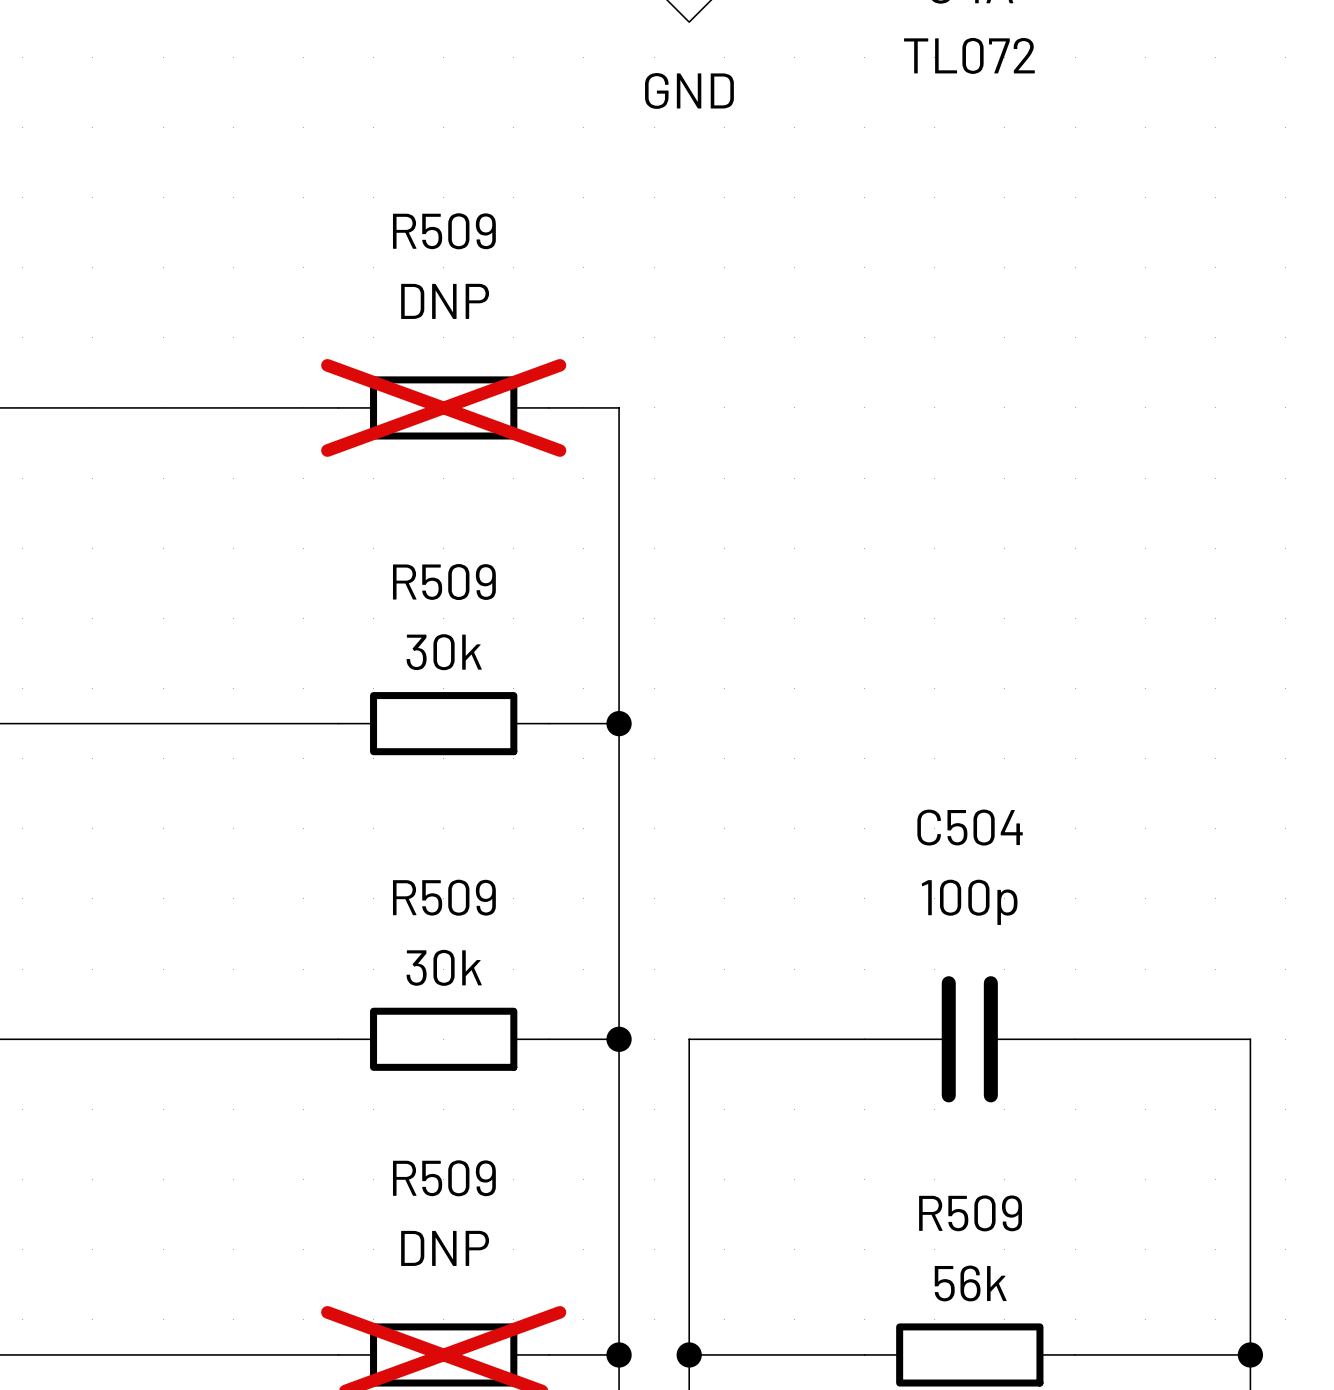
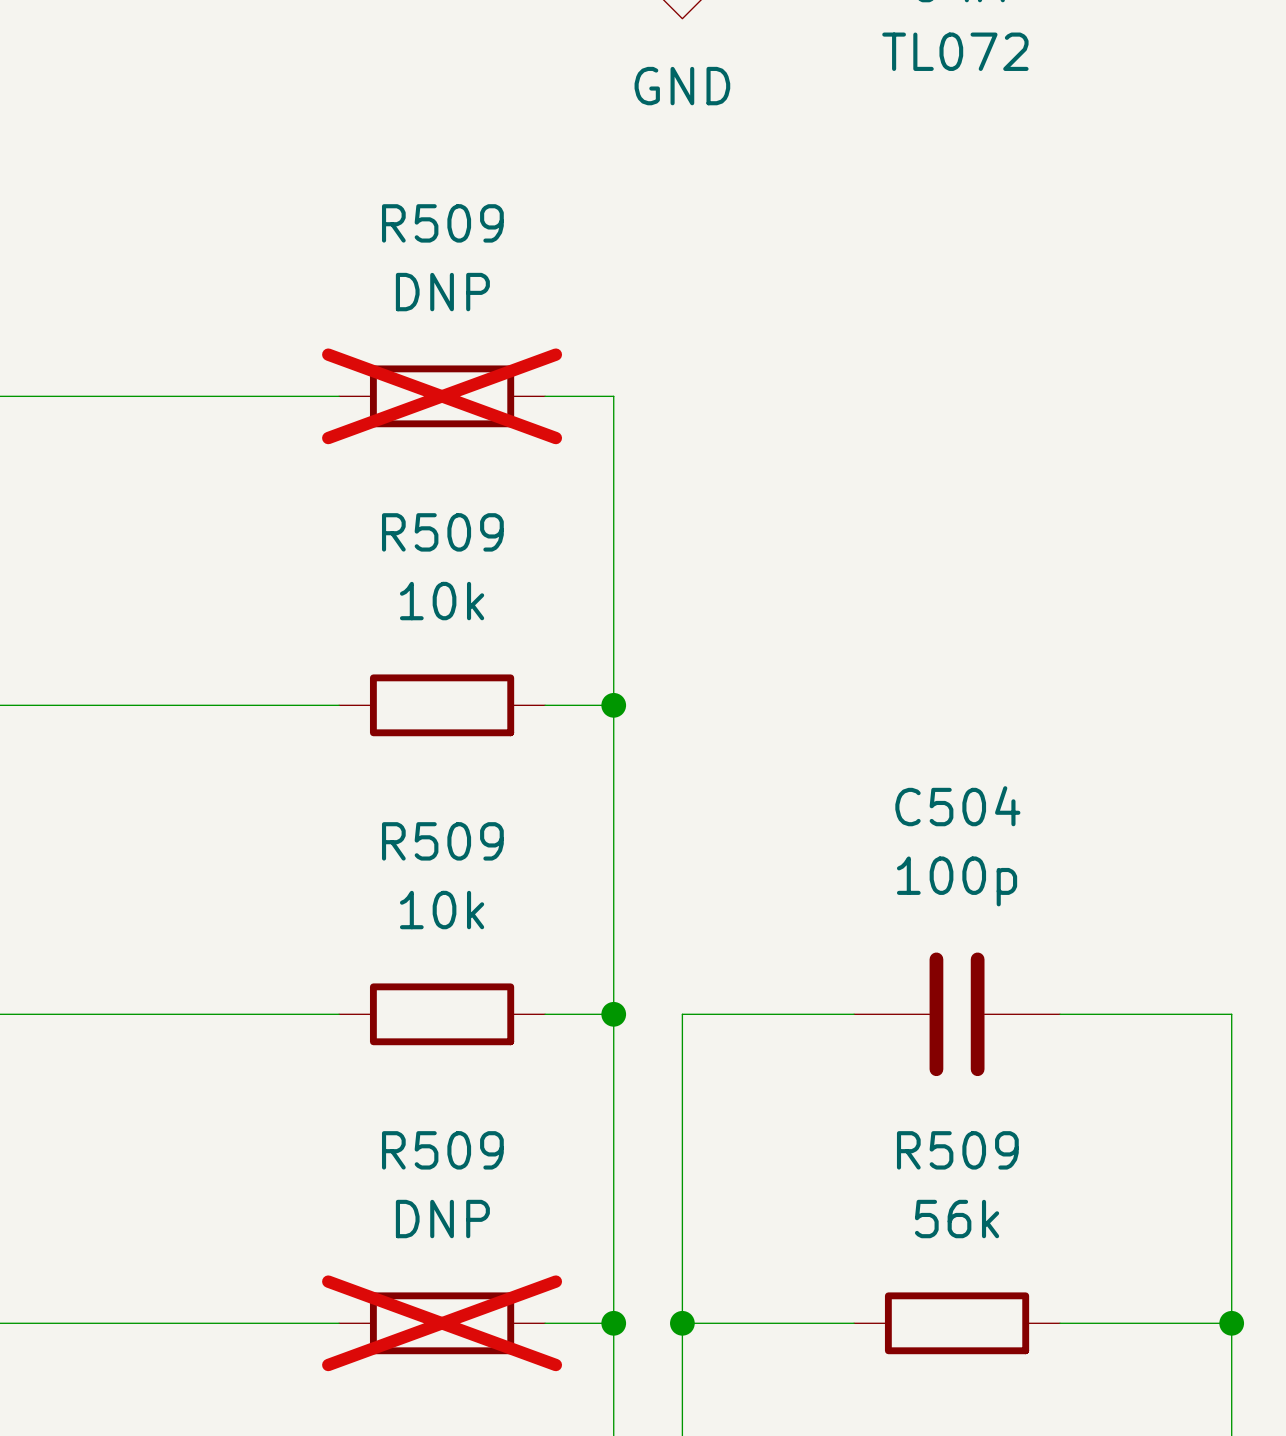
R509 name position: R509 (444, 582) -> R509 (442, 532)
R509 value: 30k (444, 652) -> 10k (442, 601)
R509 name position: R509 (444, 897) -> R509 (442, 841)
R509 value: 30k (444, 967) -> 10k (442, 910)
R509 name position: R509 (970, 1213) -> R509 (957, 1150)
R509 value position: 56k (970, 1283) -> 56k (957, 1219)

